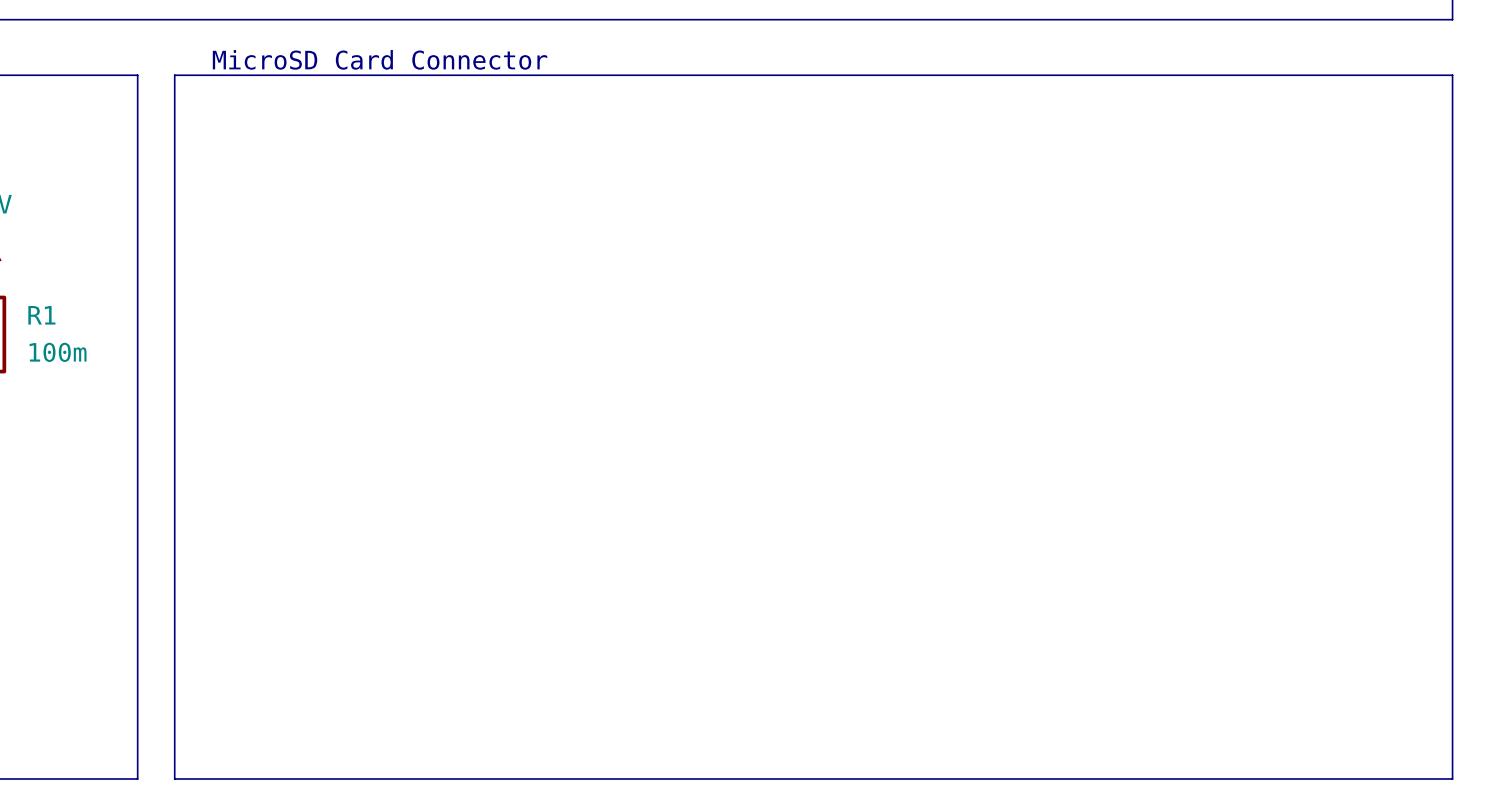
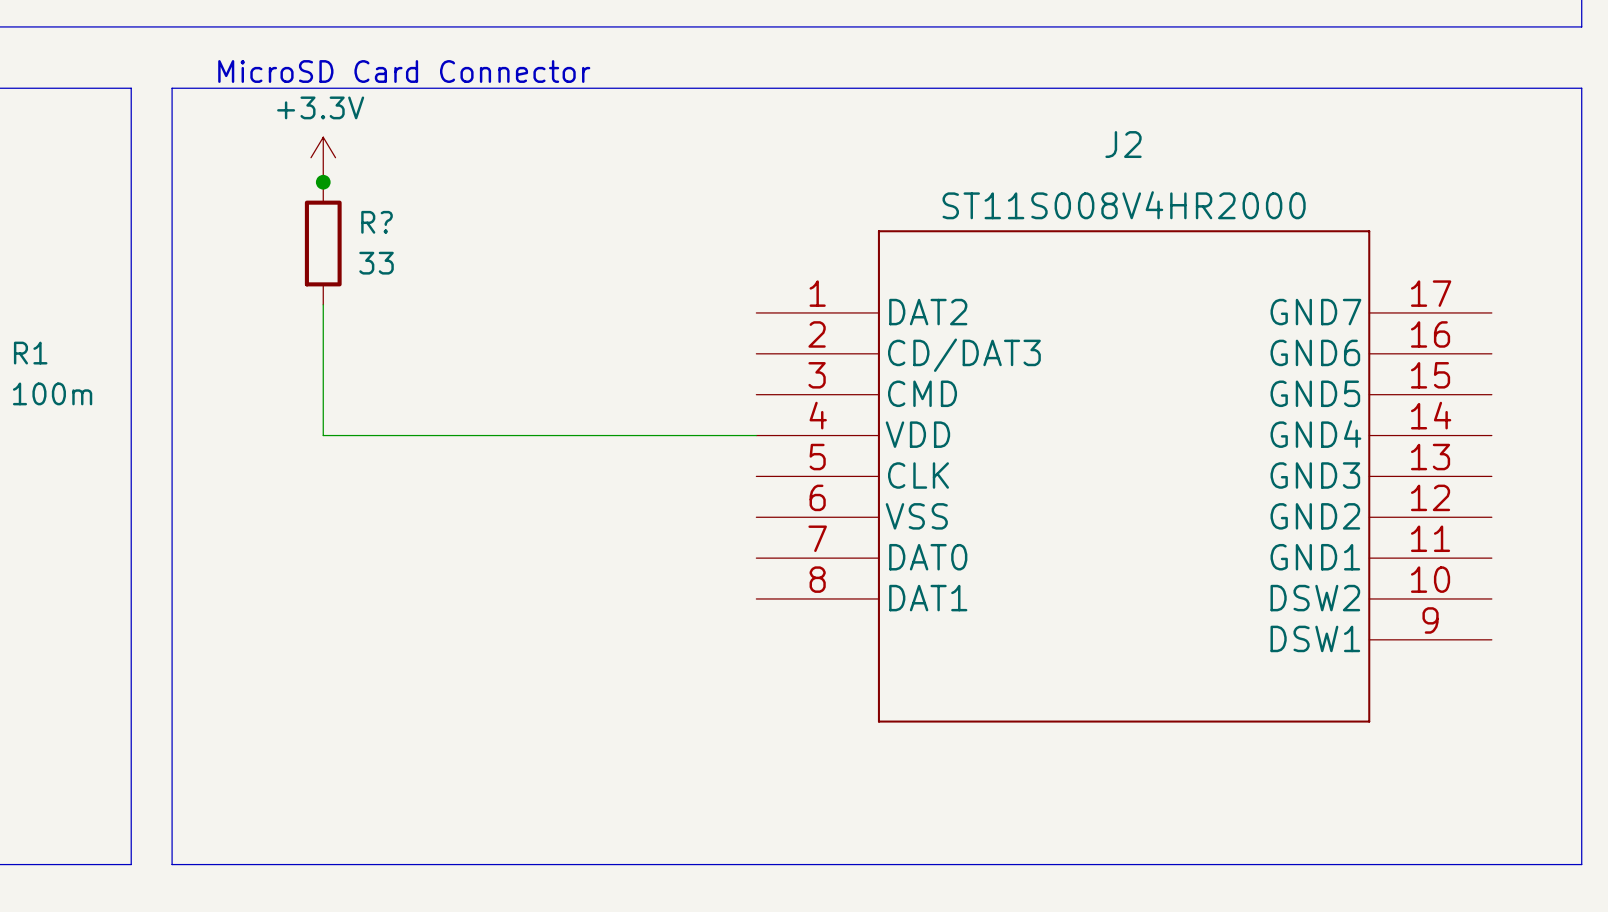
power symbol: none -> +3.3V (323, 157)
junction: none -> (323, 182)
R?: none -> 33 (323, 243)
wire: none -> (323, 304) (323, 435) (756, 435)
J2: none -> ST11S008V4HR2000 (1124, 476)

